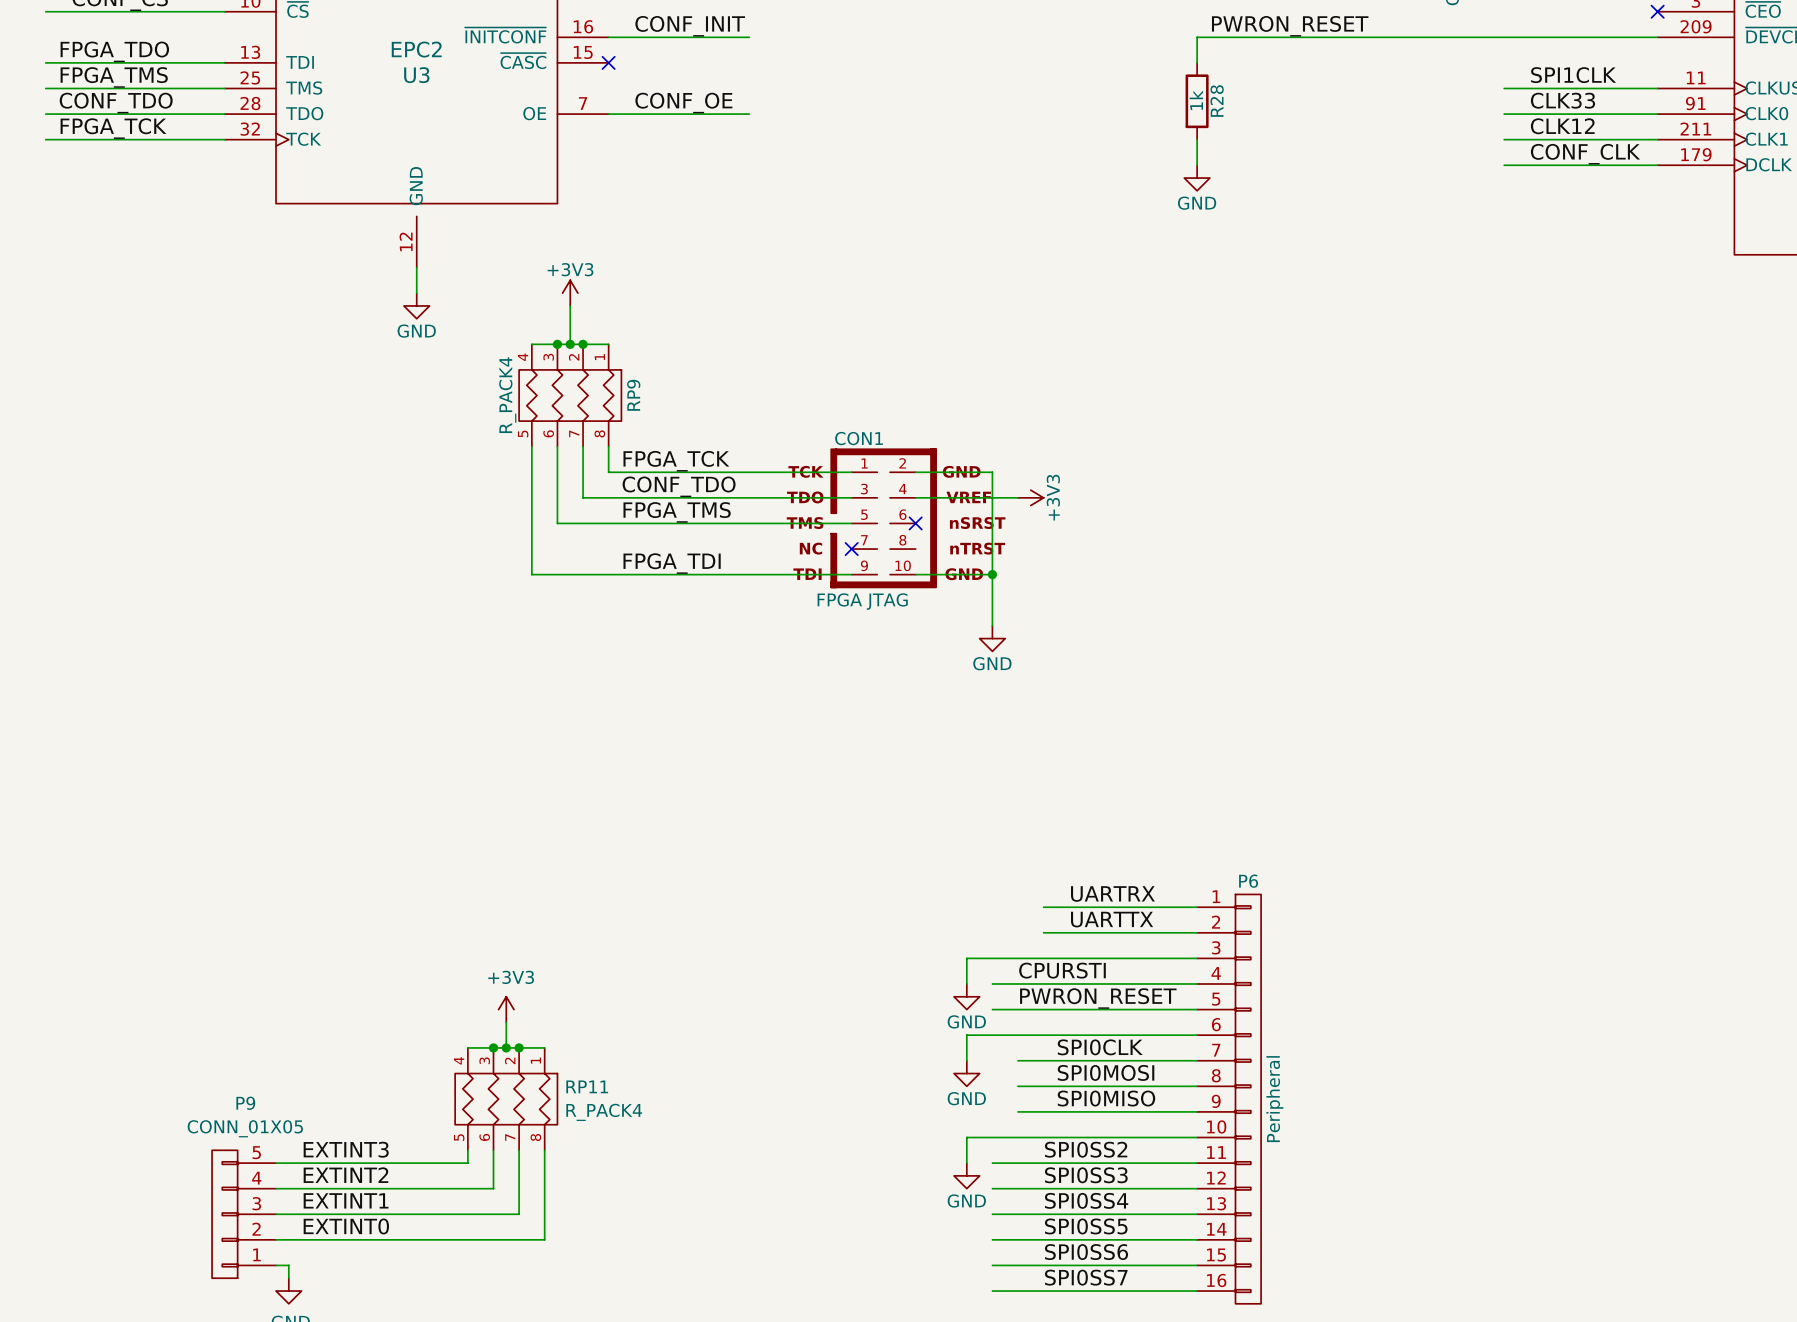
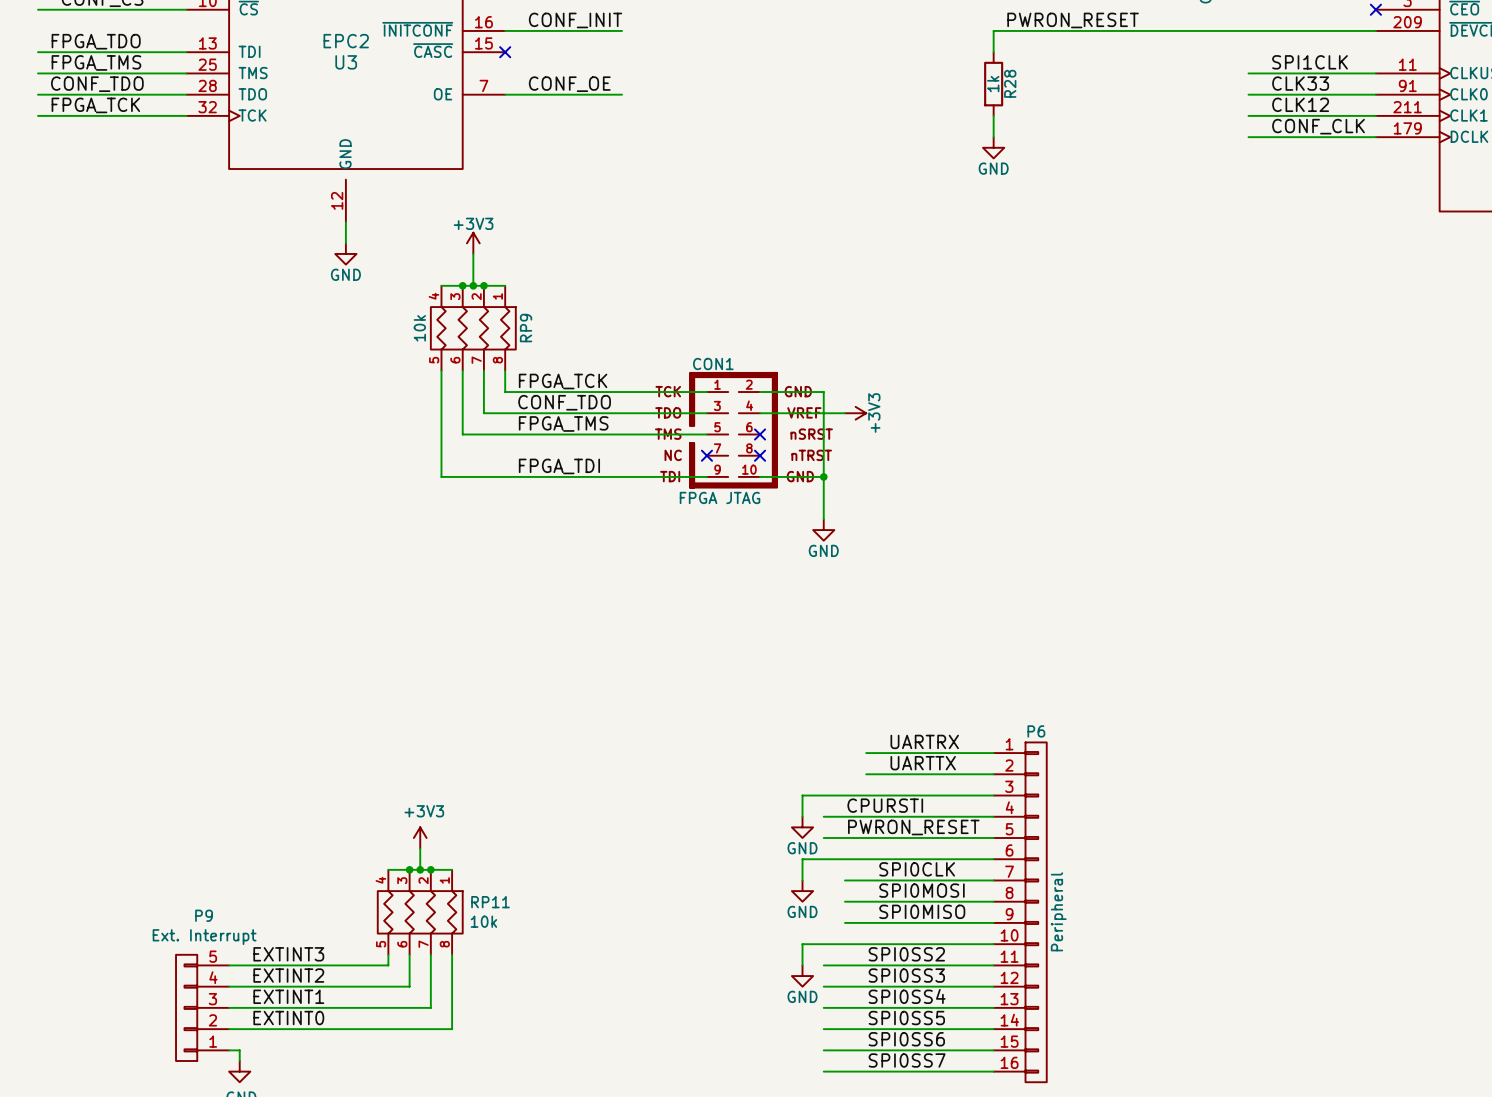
RP9 value: R_PACK4 (507, 395) -> 10k (419, 328)
no-connect mark: none -> (760, 455)
RP11 value: R_PACK4 (604, 1112) -> 10k (483, 921)
P9 value: CONN_01X05 (245, 1128) -> Ext. Interrupt (204, 937)

